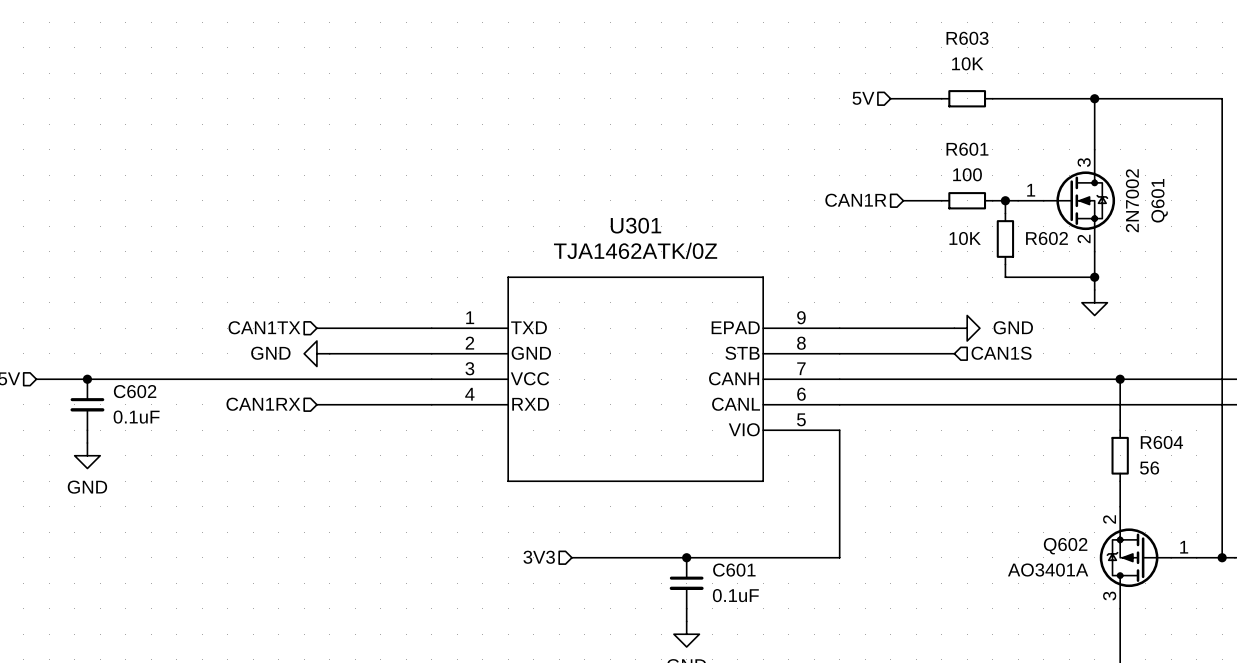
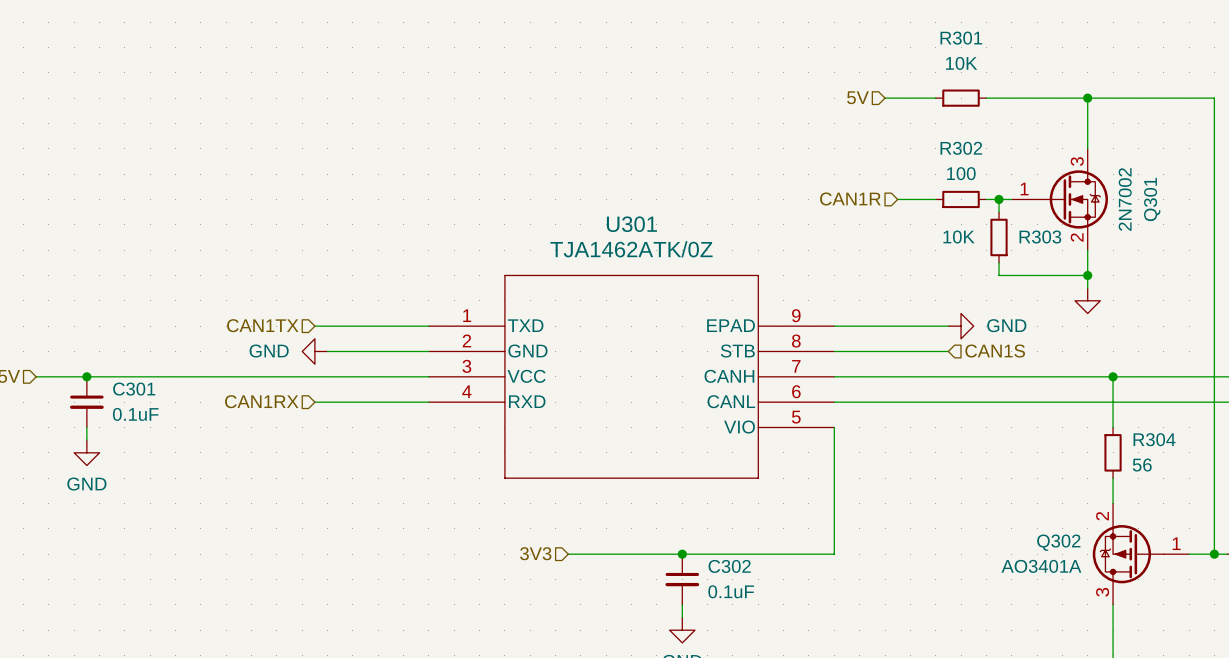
R603 name: R603 (967, 38) -> R301 (961, 38)
R601 name: R601 (967, 149) -> R302 (961, 148)
Q601 name: Q601 (1159, 200) -> Q301 (1152, 199)
R602 name: R602 (1046, 238) -> R303 (1040, 236)
C602 name: C602 (135, 391) -> C301 (134, 389)
R604 name: R604 (1161, 442) -> R304 (1154, 439)
Q602 name: Q602 (1065, 546) -> Q302 (1058, 542)
C601 name: C601 (734, 570) -> C302 (729, 566)

